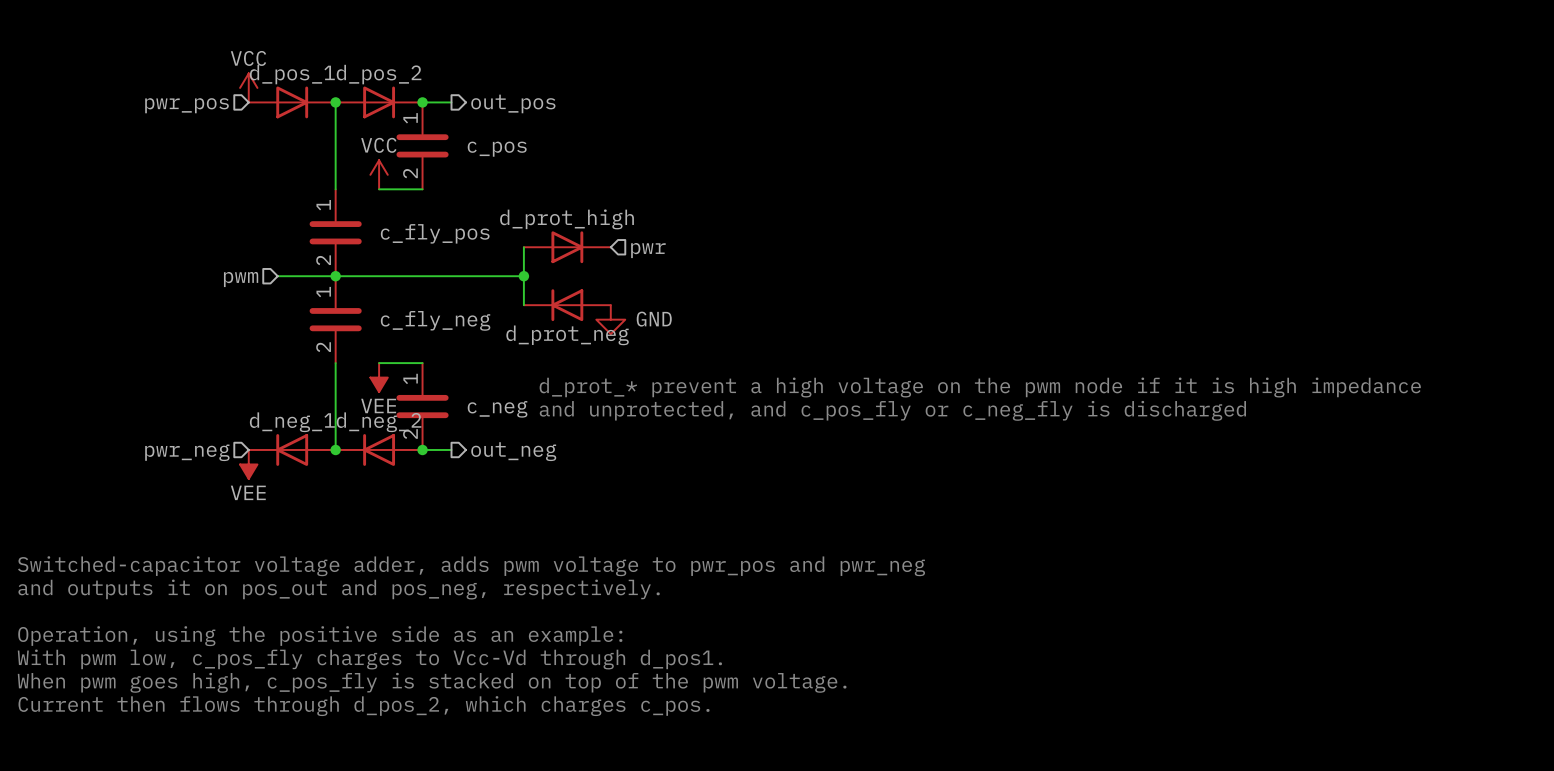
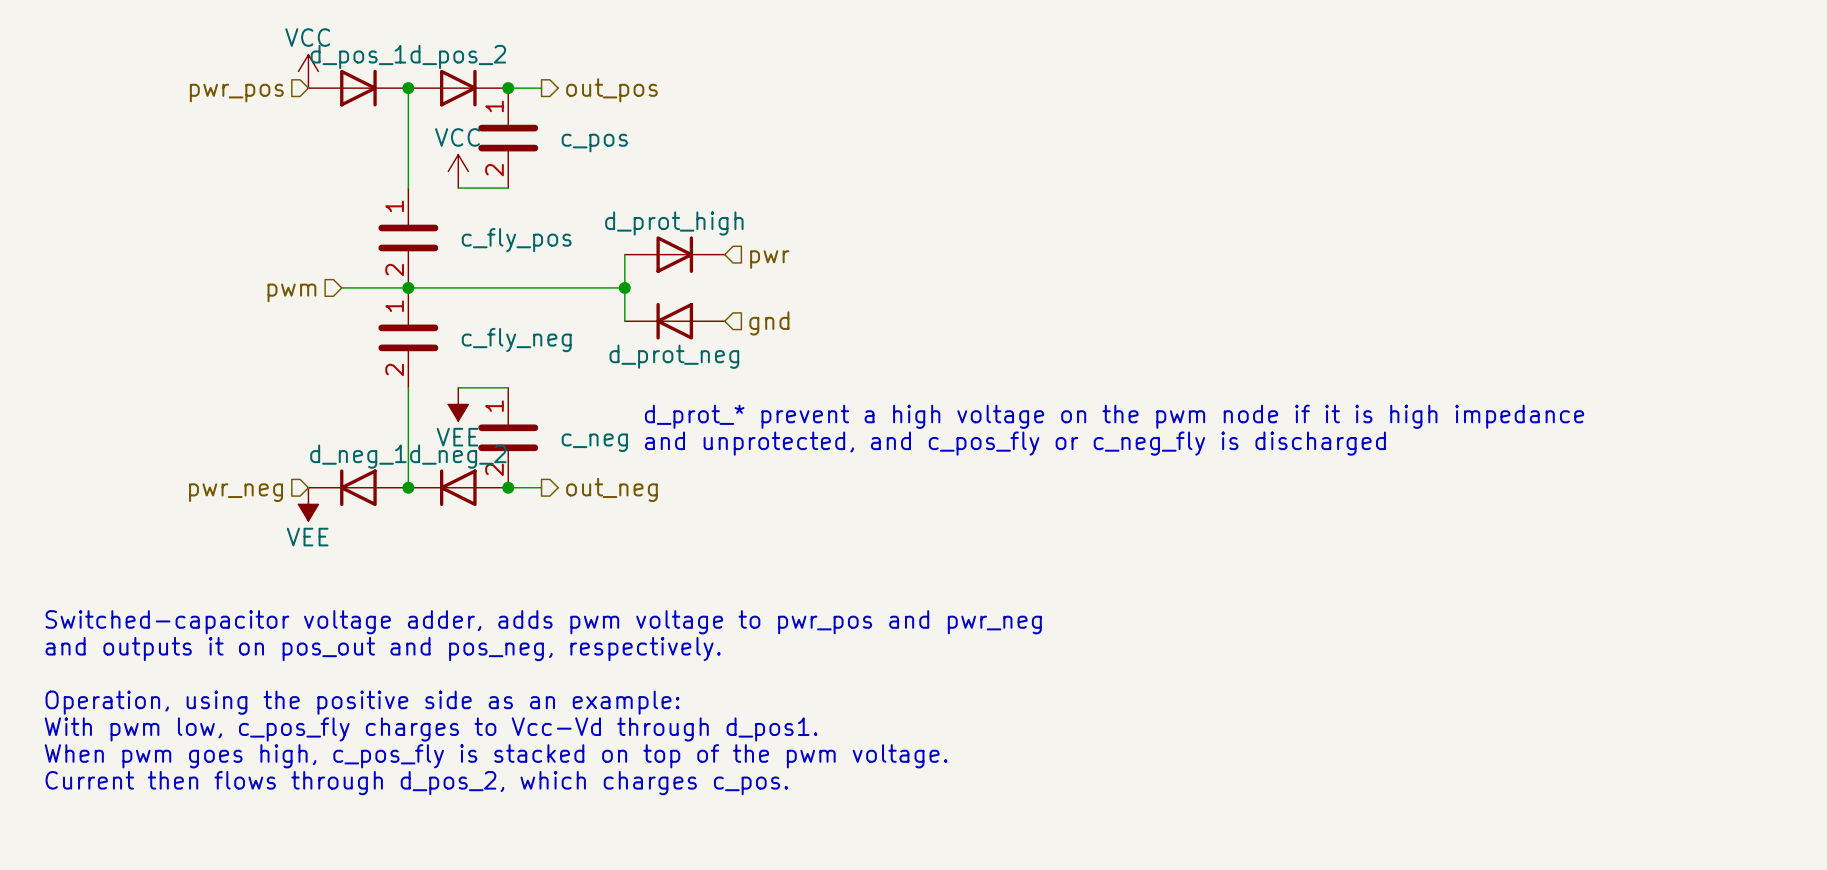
hierarchical label: none -> gnd (769, 323)
power symbol: GND (610, 319) -> none

